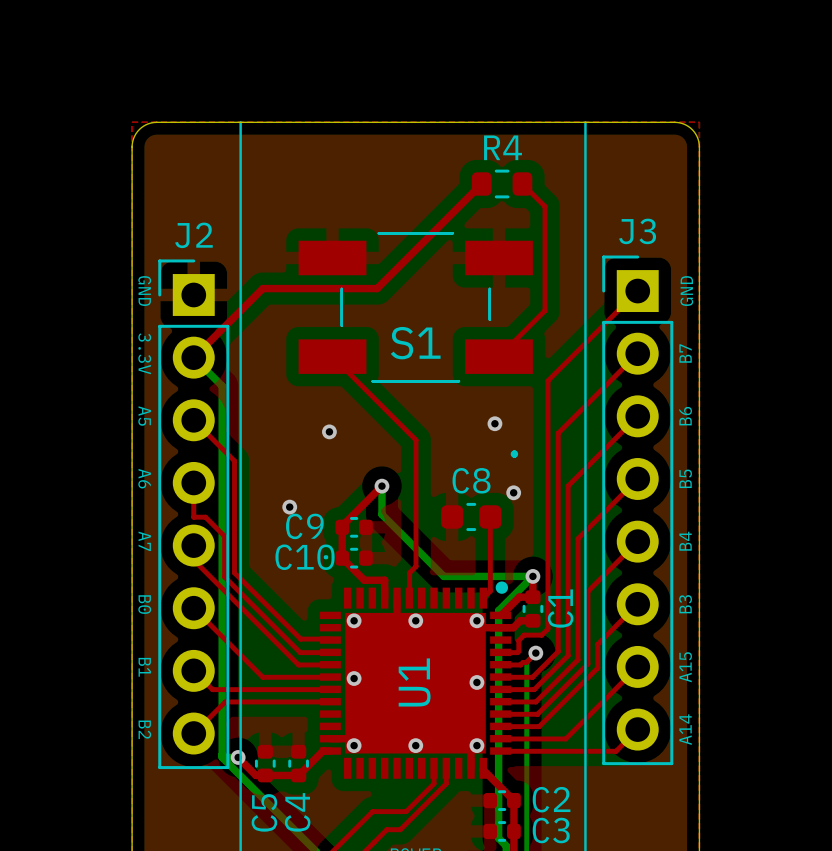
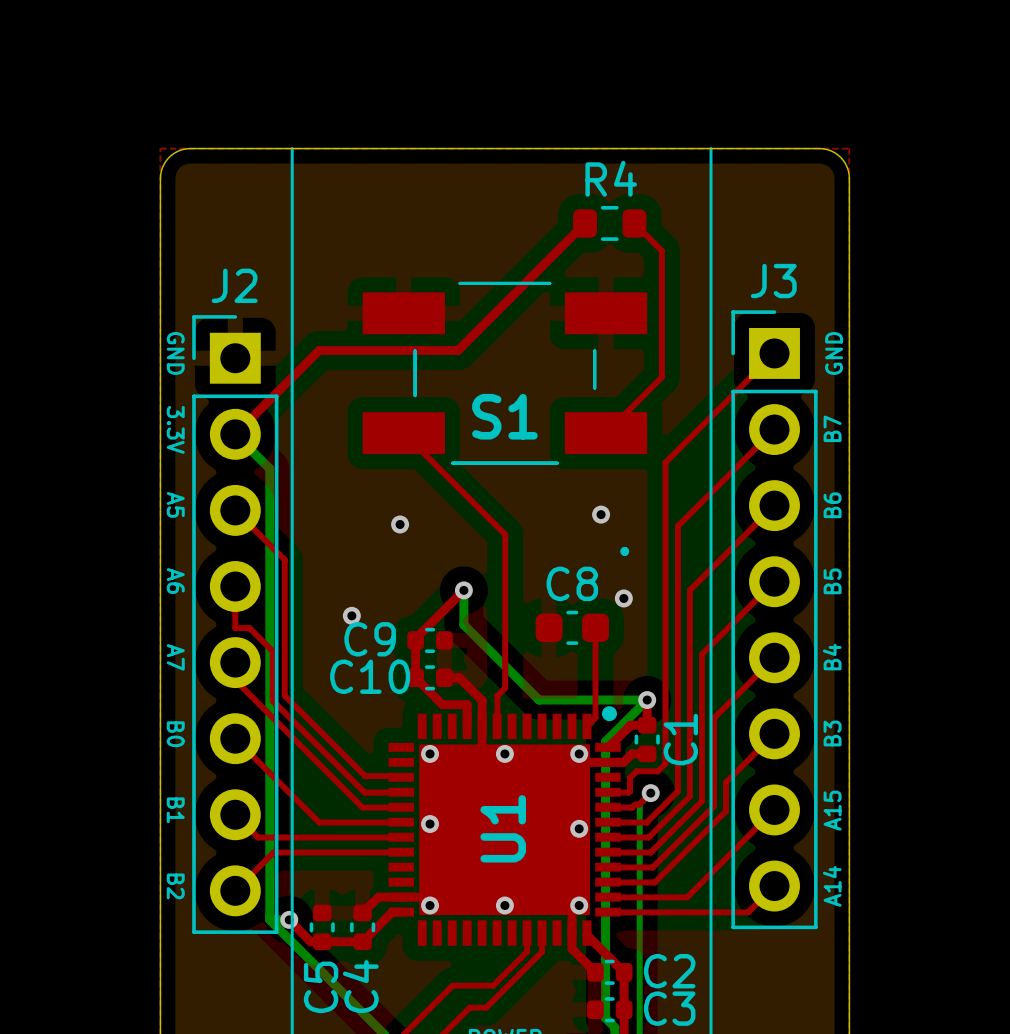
top track: none -> (444, 677) (459, 677) (482, 700) (482, 726)
top track: none -> (401, 897) (378, 897) (362, 913)
top track: none -> (572, 933) (572, 948) (595, 972)

